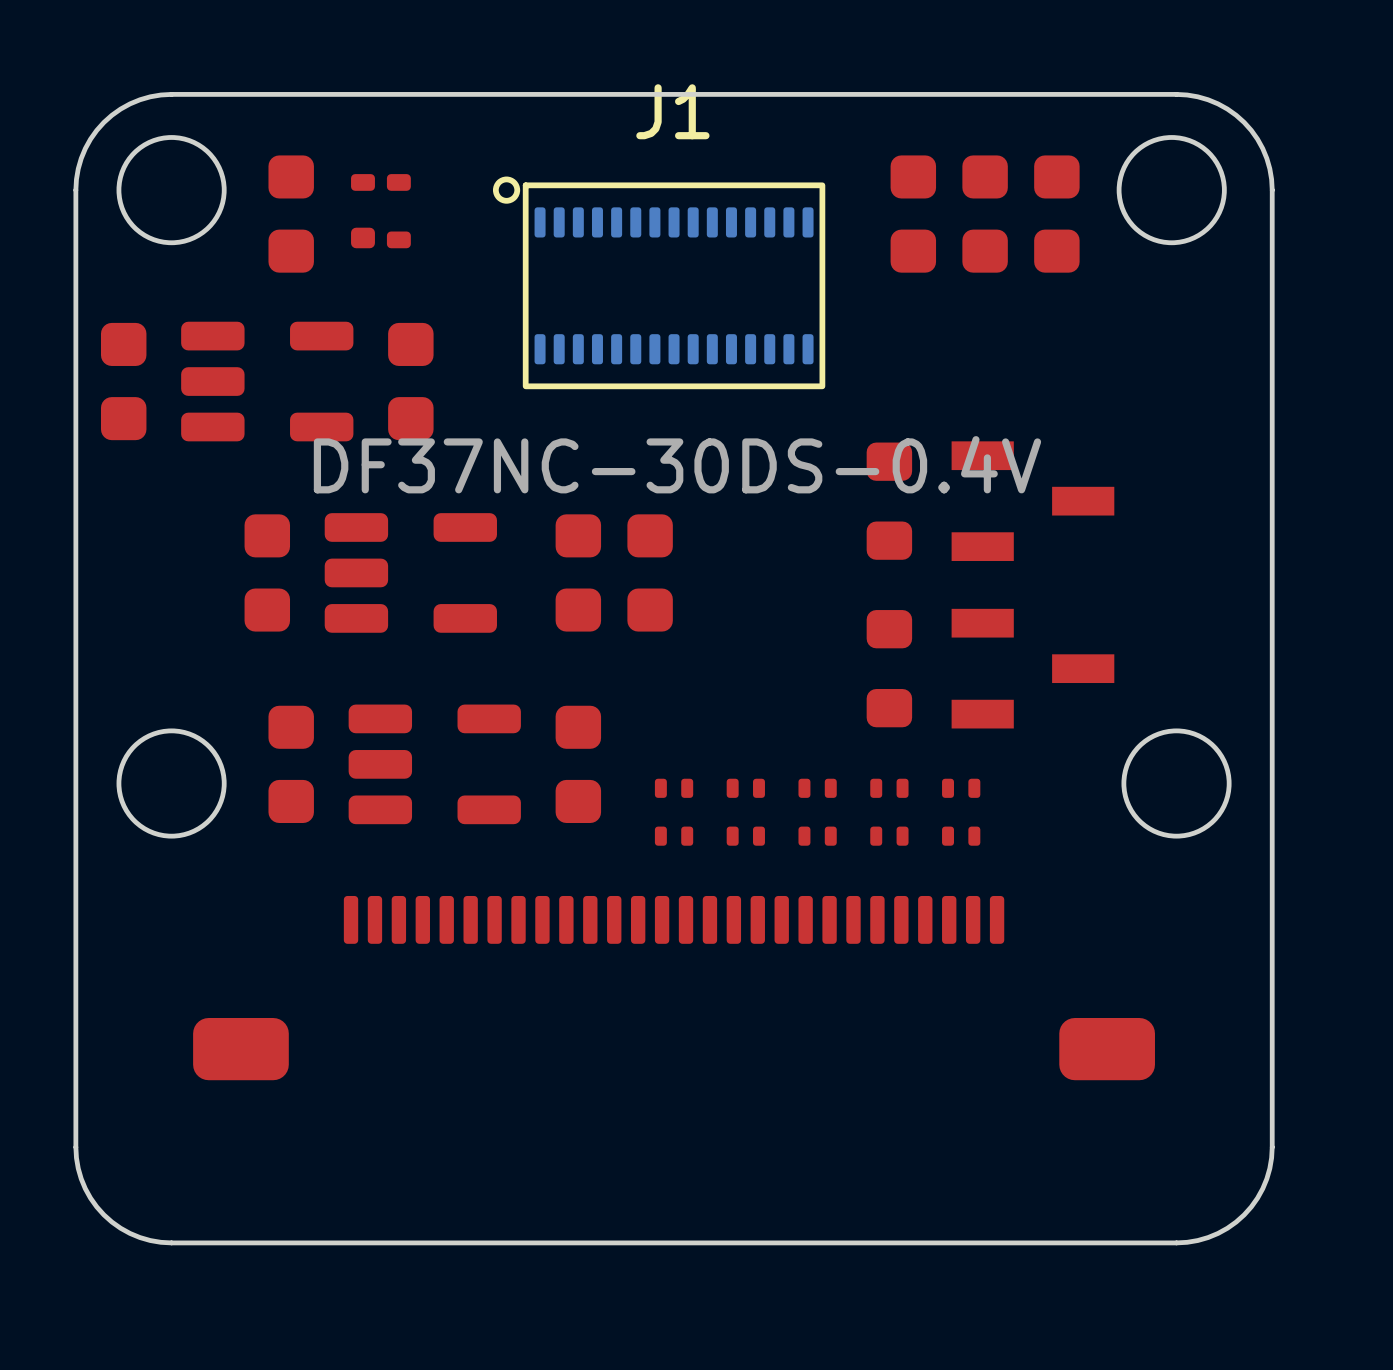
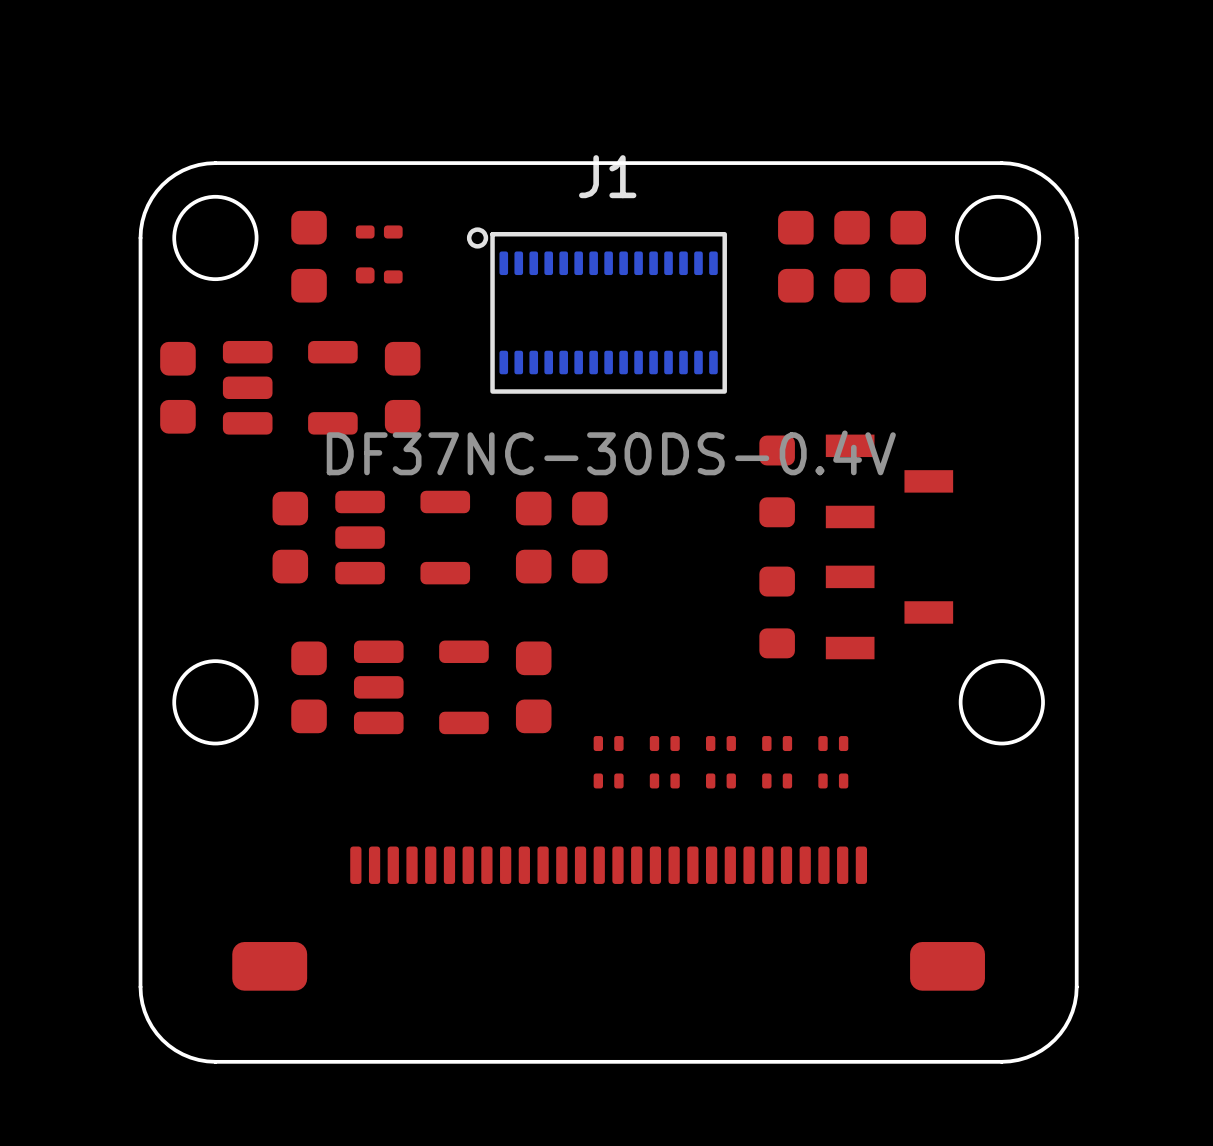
part: (674, 812) -> none
part: (745, 812) -> none
part: (817, 812) -> none
part: (889, 812) -> none
part: (961, 812) -> none
part: none -> (608, 762)
part: none -> (664, 762)
part: none -> (720, 762)
part: none -> (777, 762)
part: none -> (833, 762)
part position: (674, 988) -> (608, 918)

